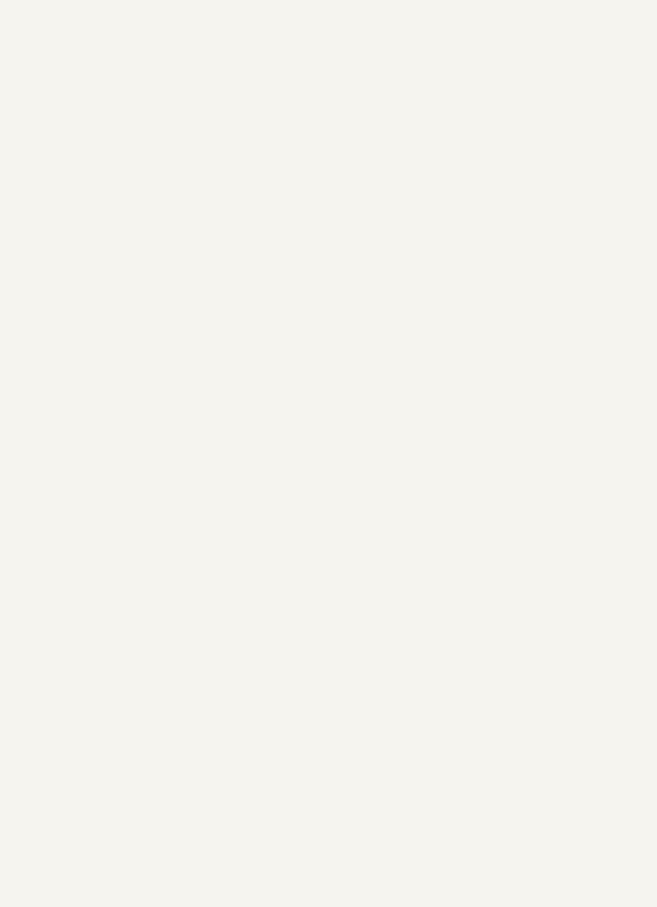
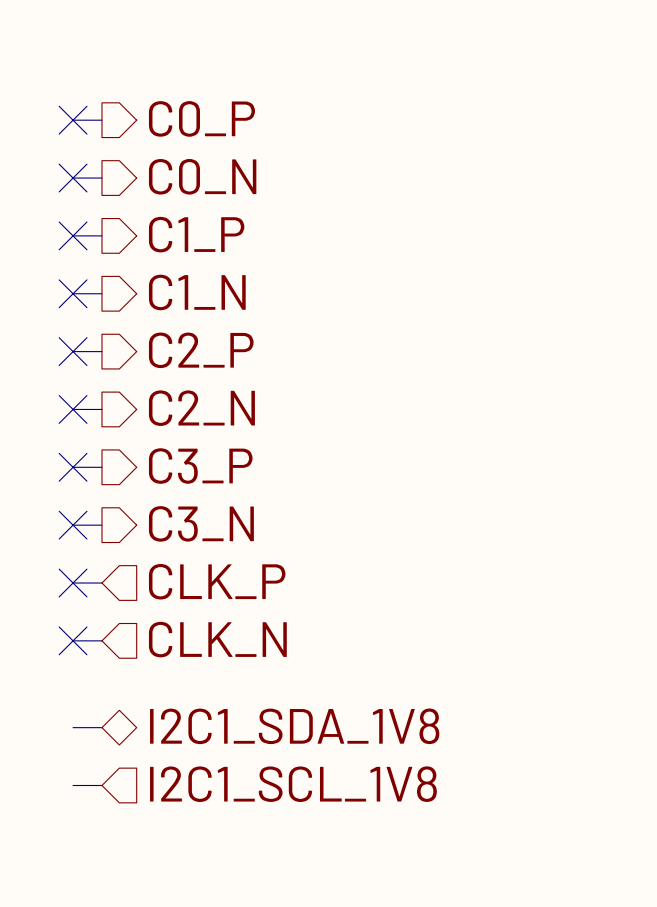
wire: none -> (73, 120) (101, 120)
no-connect mark: none -> (73, 120)
hierarchical label: none -> C0_P (201, 118)
wire: none -> (73, 178) (101, 178)
no-connect mark: none -> (73, 178)
hierarchical label: none -> C0_N (202, 176)
wire: none -> (73, 235) (101, 235)
no-connect mark: none -> (73, 235)
hierarchical label: none -> C1_P (196, 234)
wire: none -> (73, 293) (101, 293)
no-connect mark: none -> (73, 293)
hierarchical label: none -> C1_N (197, 292)
wire: none -> (73, 351) (101, 351)
no-connect mark: none -> (73, 351)
hierarchical label: none -> C2_P (201, 350)
wire: none -> (73, 409) (101, 409)
no-connect mark: none -> (73, 409)
hierarchical label: none -> C2_N (201, 408)
wire: none -> (73, 467) (101, 467)
no-connect mark: none -> (73, 467)
hierarchical label: none -> C3_P (200, 466)
wire: none -> (73, 525) (101, 525)
no-connect mark: none -> (73, 525)
hierarchical label: none -> C3_N (201, 523)
wire: none -> (73, 583) (101, 583)
no-connect mark: none -> (73, 583)
hierarchical label: none -> CLK_P (217, 581)
wire: none -> (73, 640) (101, 640)
no-connect mark: none -> (73, 640)
hierarchical label: none -> CLK_N (217, 639)
wire: none -> (73, 727) (101, 727)
hierarchical label: none -> I2C1_SDA_1V8 (294, 726)
wire: none -> (73, 785) (101, 785)
hierarchical label: none -> I2C1_SCL_1V8 (293, 784)

